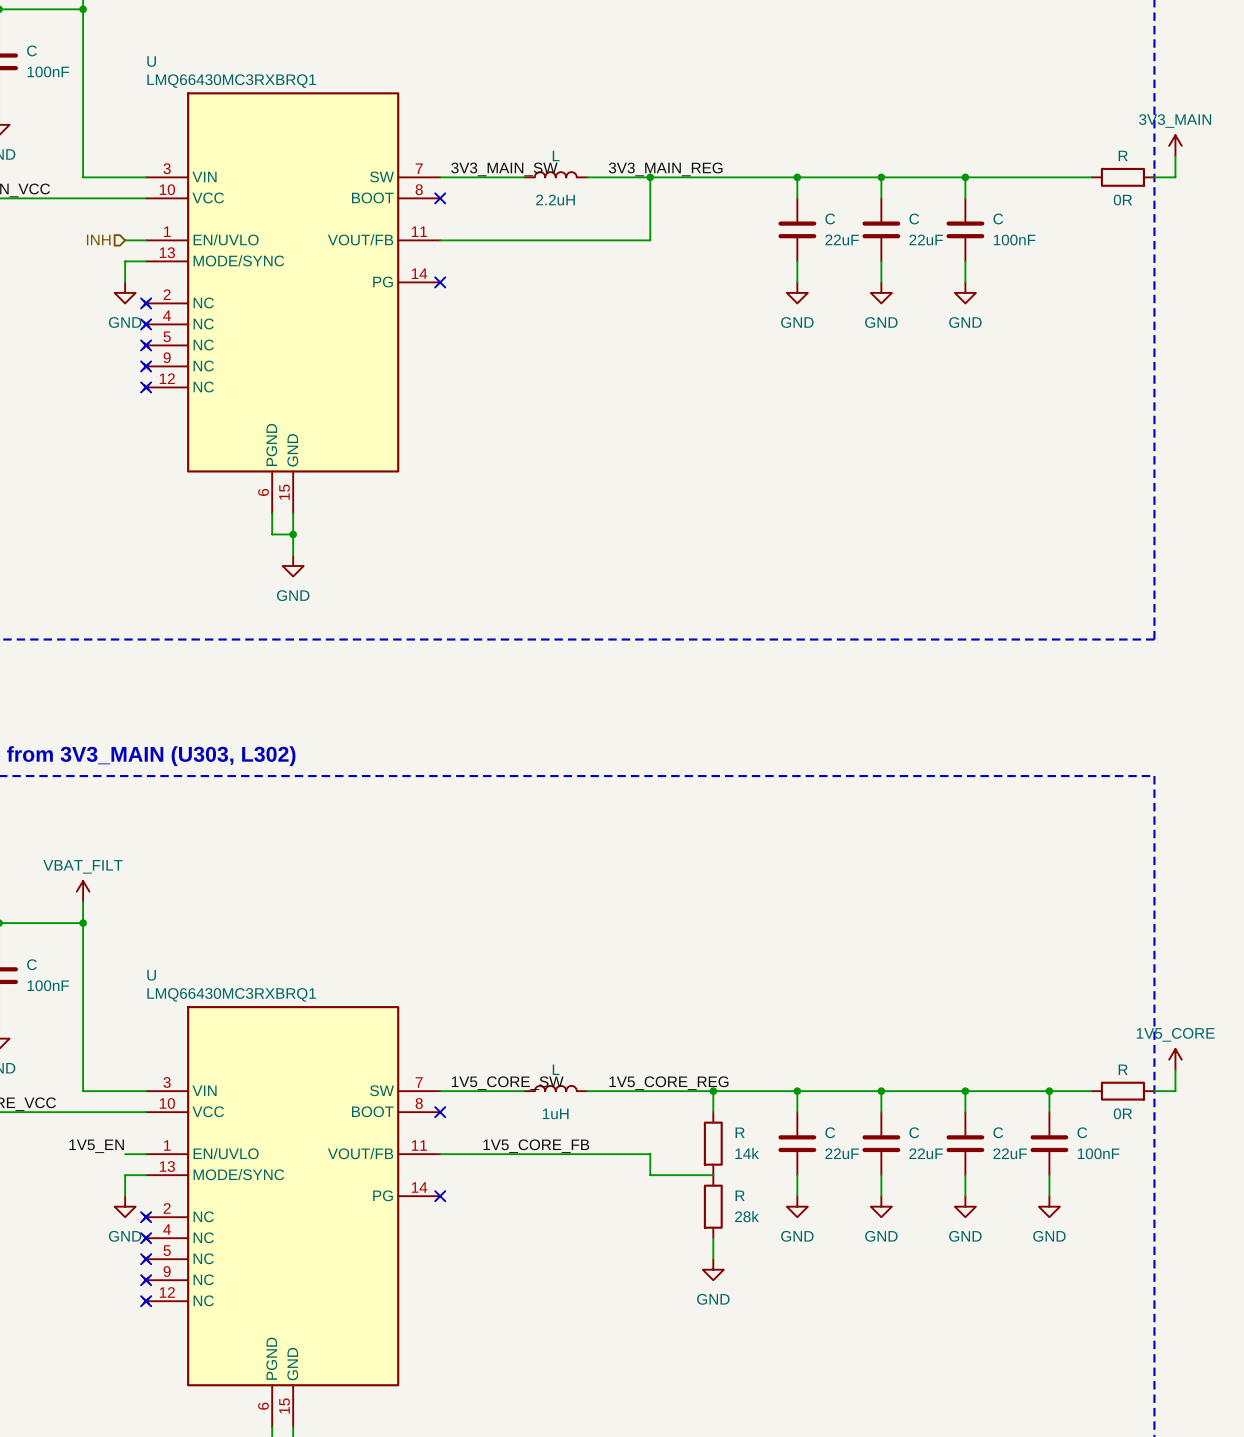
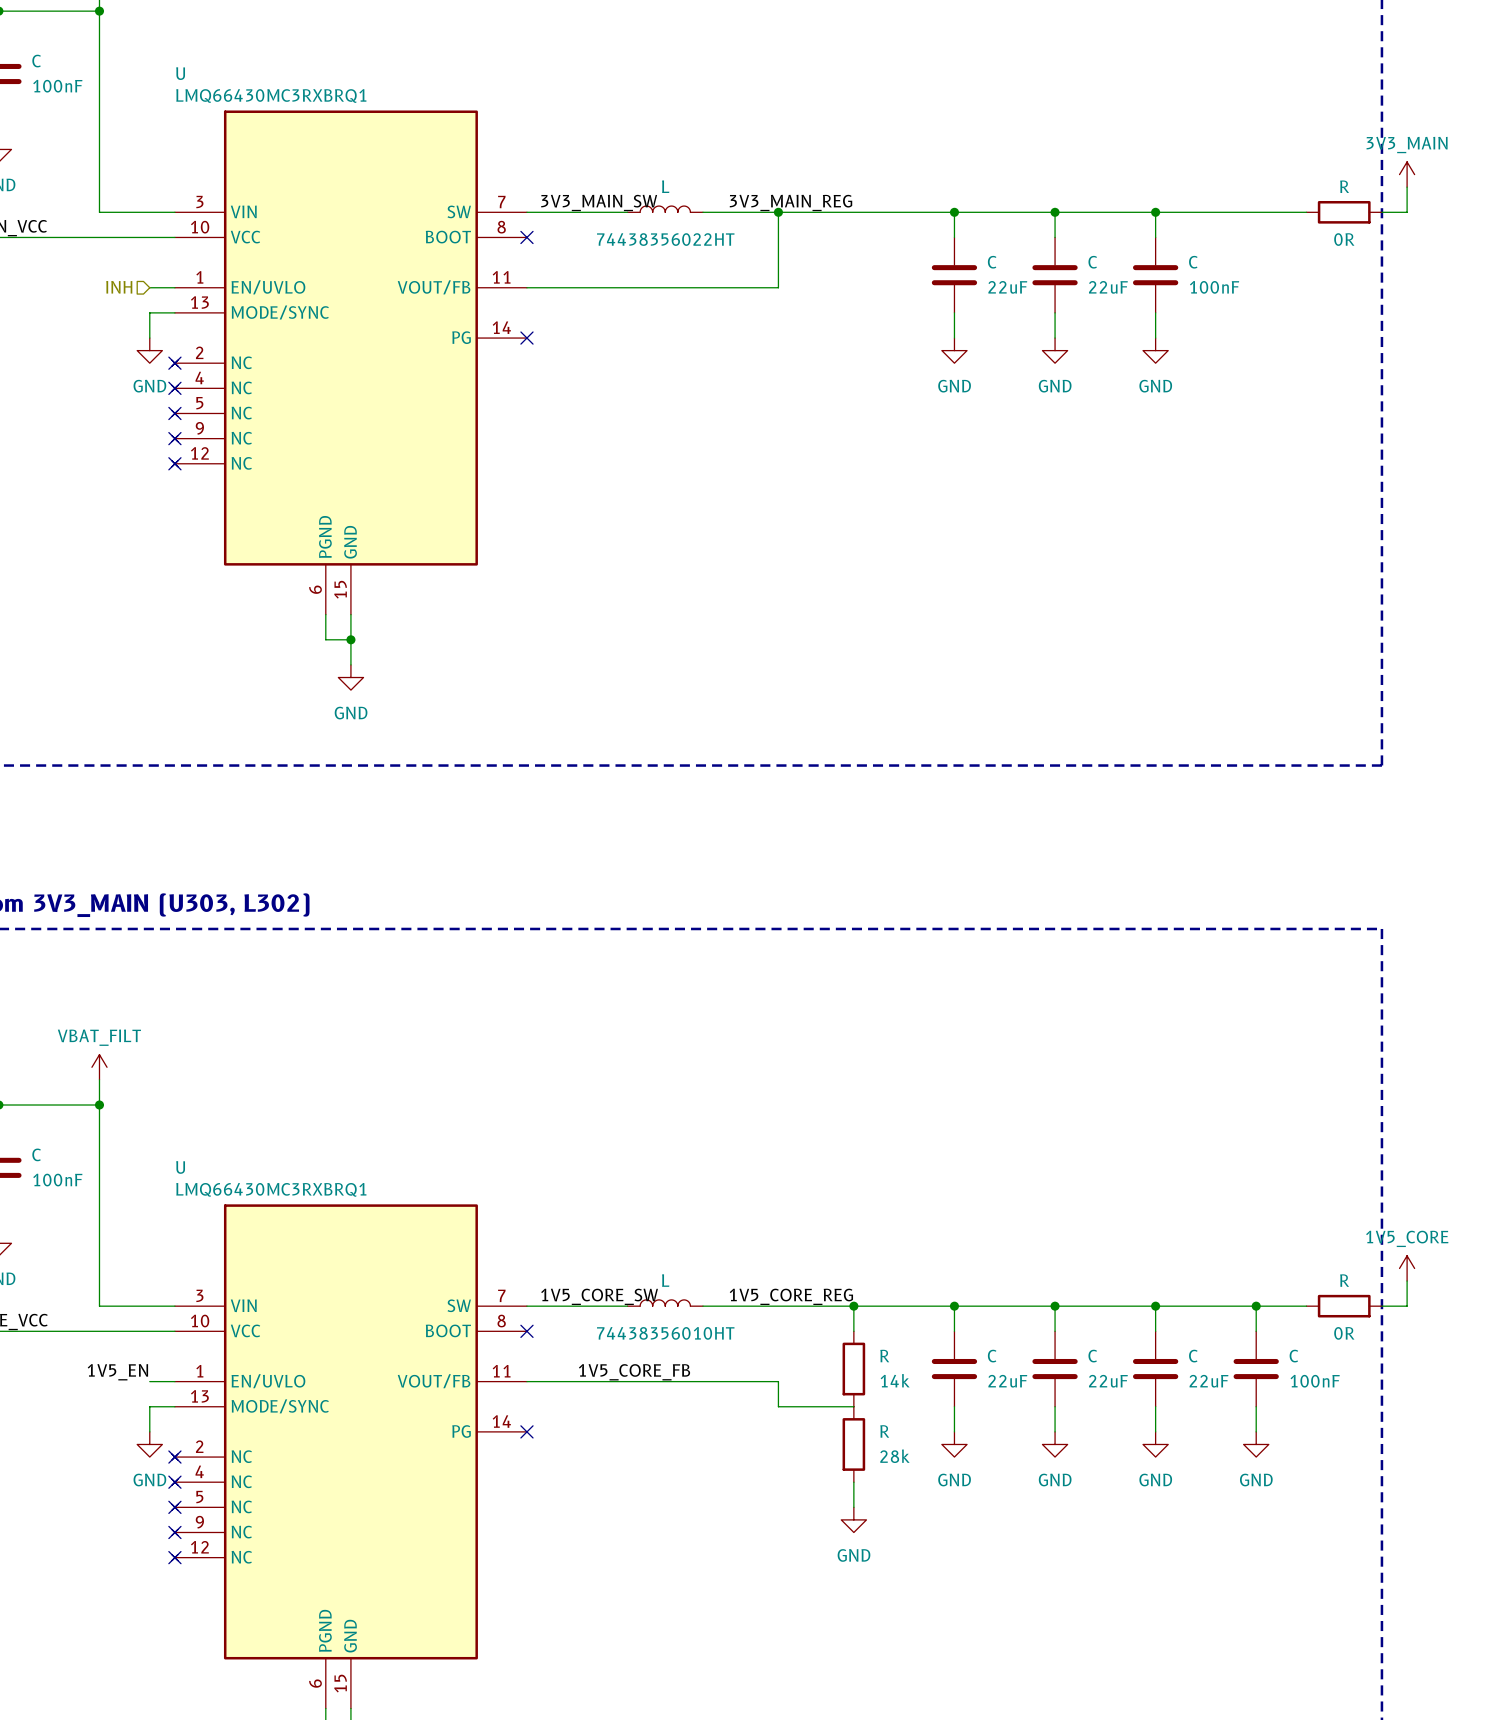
L value: 2.2uH (555, 200) -> 74438356022HT (665, 239)
L value: 1uH (555, 1113) -> 74438356010HT (665, 1333)

